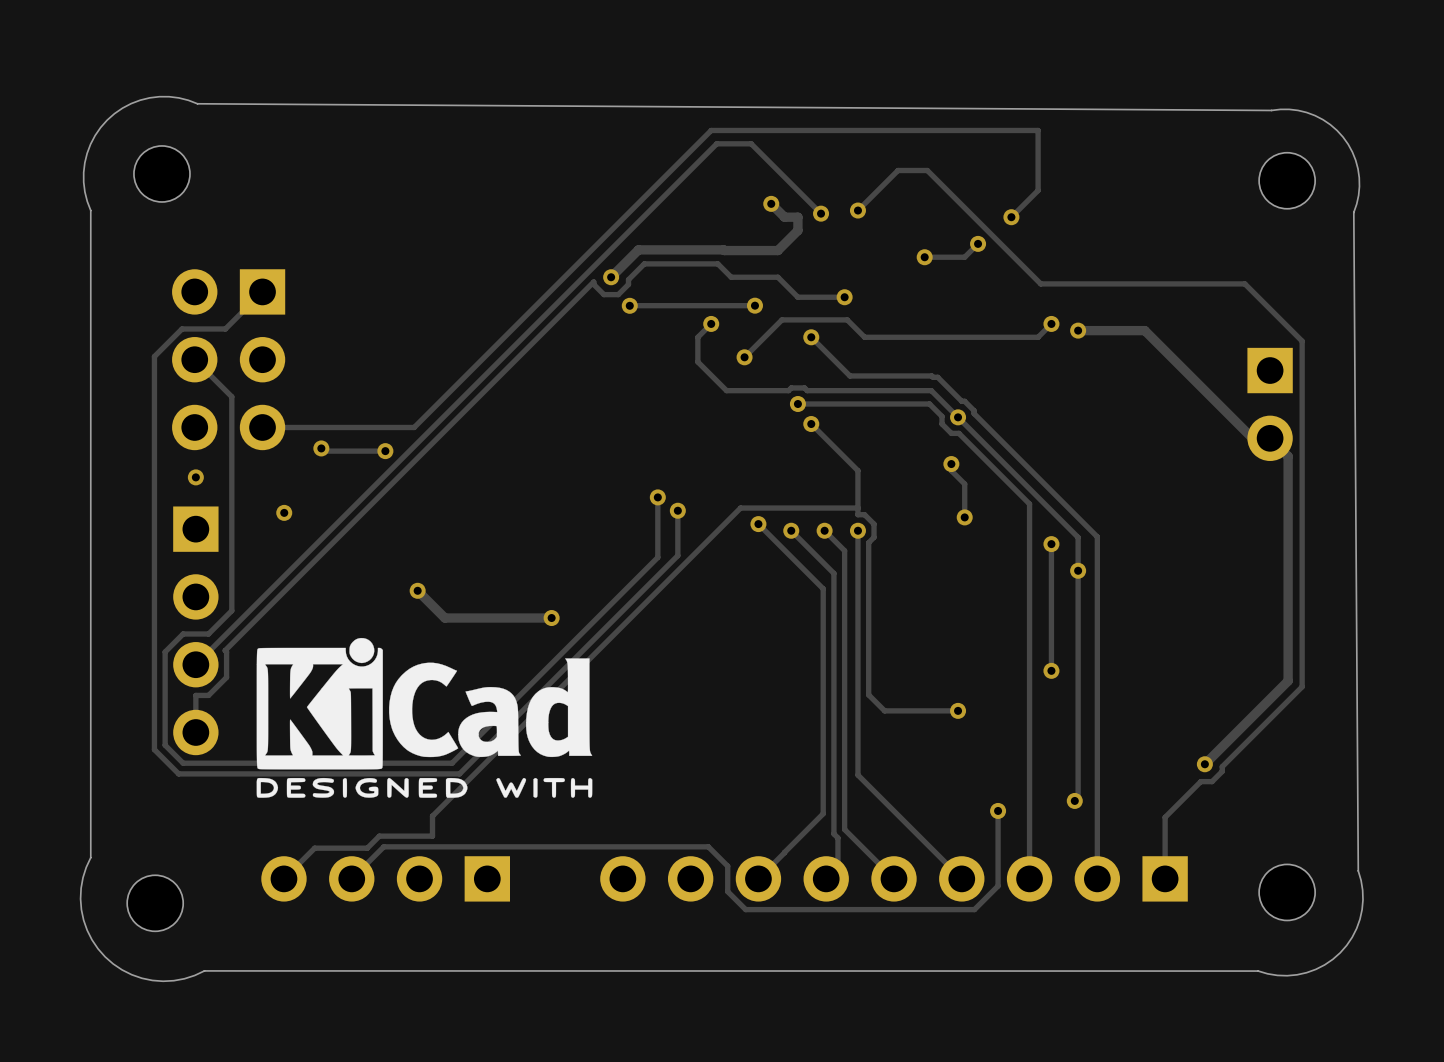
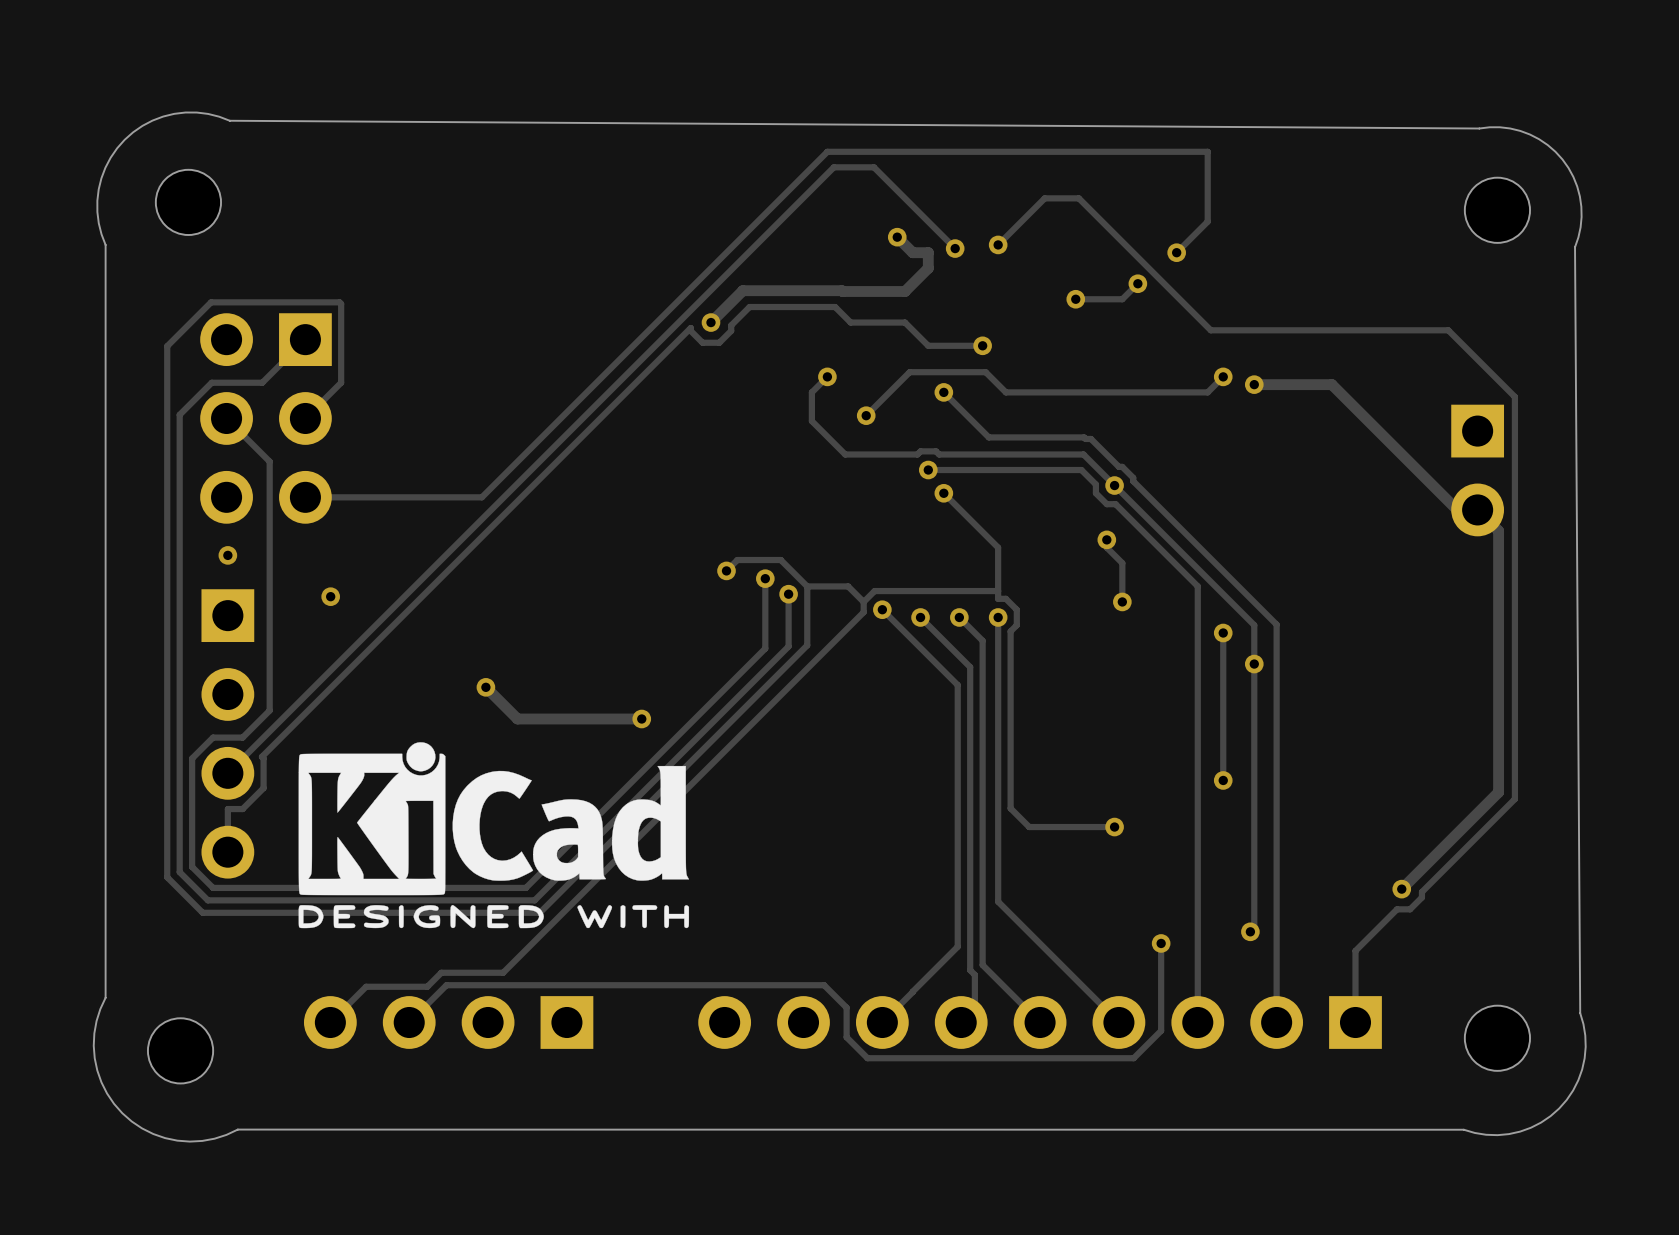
via: (629, 305) -> none
track: (754, 305) (629, 305) -> none
via: (754, 305) -> none
track: none -> (305, 418) (341, 382) (341, 303) (339, 302) (211, 302) (167, 346) (167, 877) (202, 912) (539, 912)
track: (321, 448) (324, 451) (385, 451) -> none
via: (321, 448) -> none
via: (385, 451) -> none
track: none -> (726, 570) (737, 560) (780, 560) (807, 586) (807, 645)
via: none -> (726, 570)
track: none -> (807, 586) (848, 586) (863, 601)
track: (751, 508) (740, 508) (693, 554) -> (874, 591) (863, 601)
track: (464, 784) (432, 816) (432, 836) -> (863, 601) (863, 612) (503, 972)

